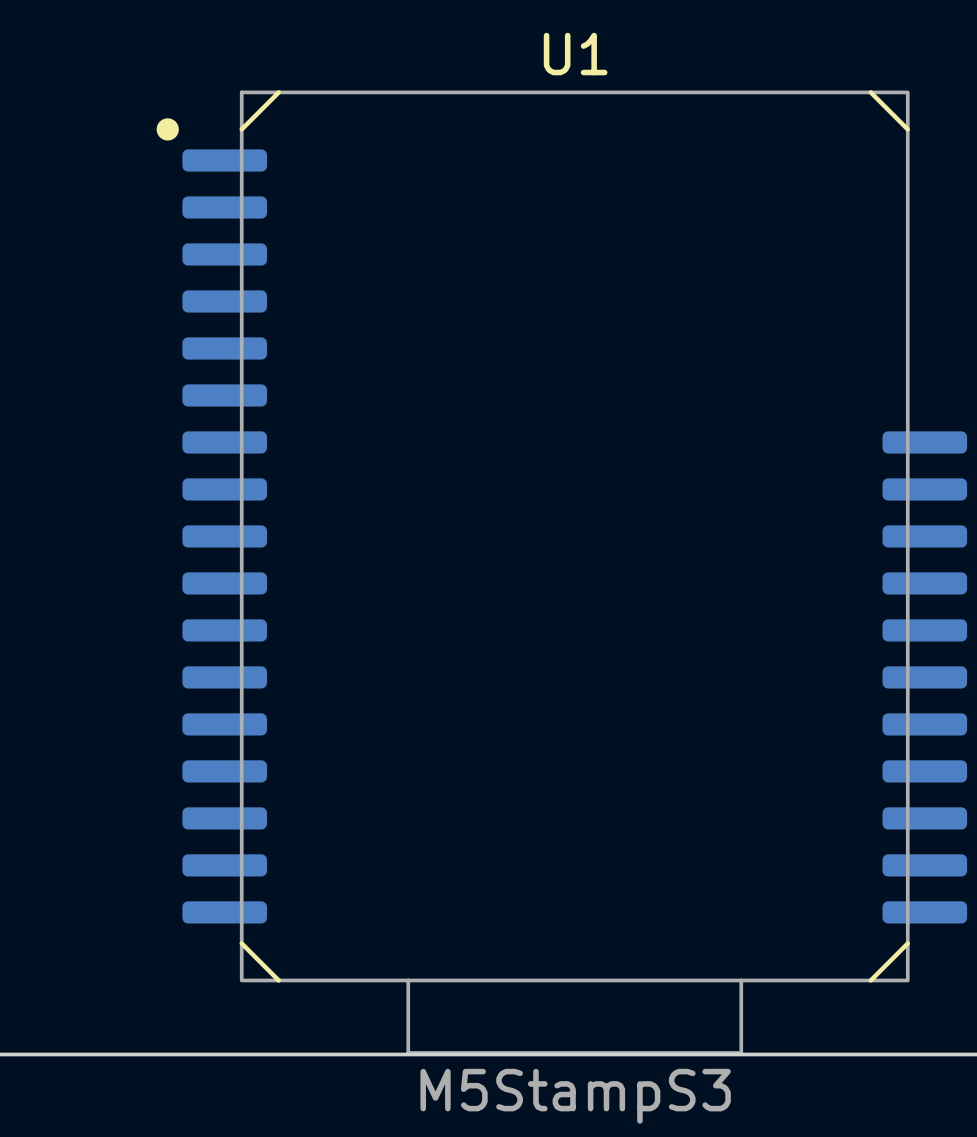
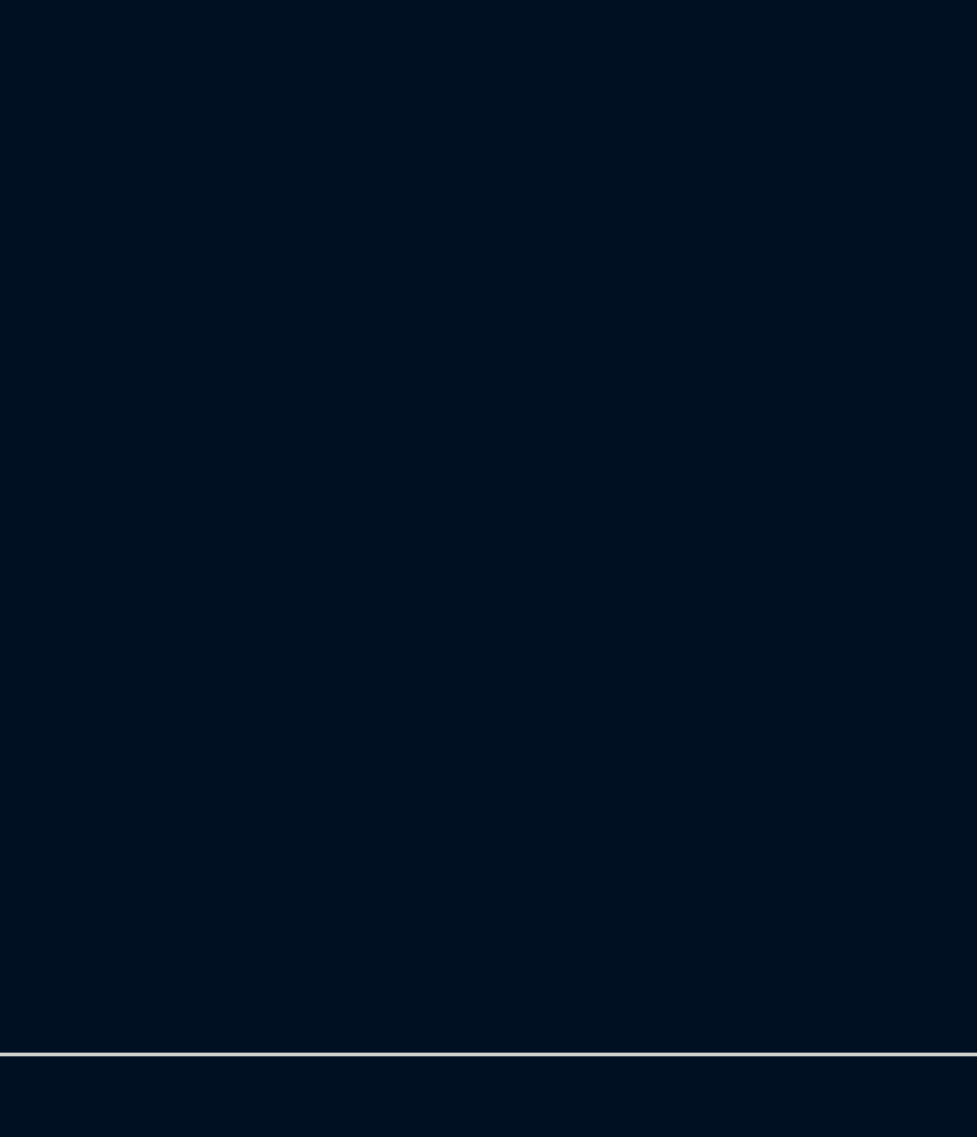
U1: M5StampS3 (561, 572) -> none

